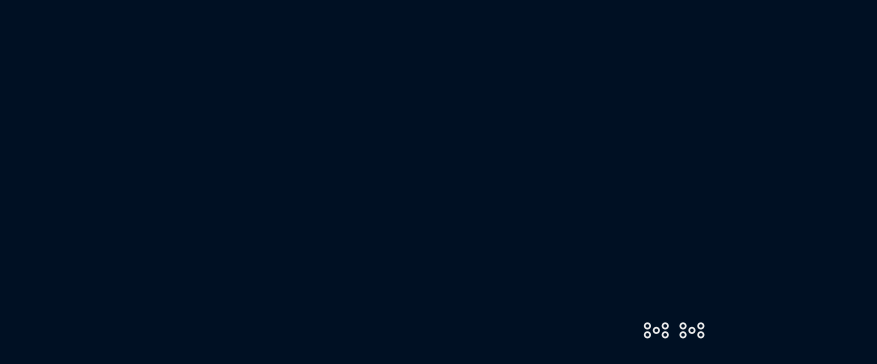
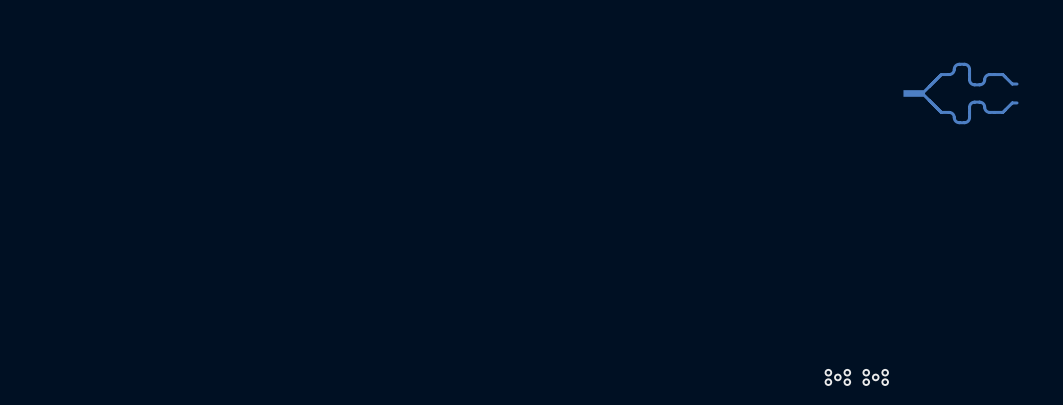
bottom track: none -> (941, 74) (951, 74) (956, 65) (965, 64) (969, 67) (969, 81) (972, 84) (982, 84) (985, 76) (989, 74) (1002, 74) (1012, 84) (1017, 84)
part: none -> (923, 93)
bottom track: none -> (1017, 102) (1012, 102) (1002, 112) (989, 112) (985, 110) (982, 102) (972, 102) (969, 106) (969, 119) (964, 122) (956, 121) (952, 113) (941, 112) (935, 106)

